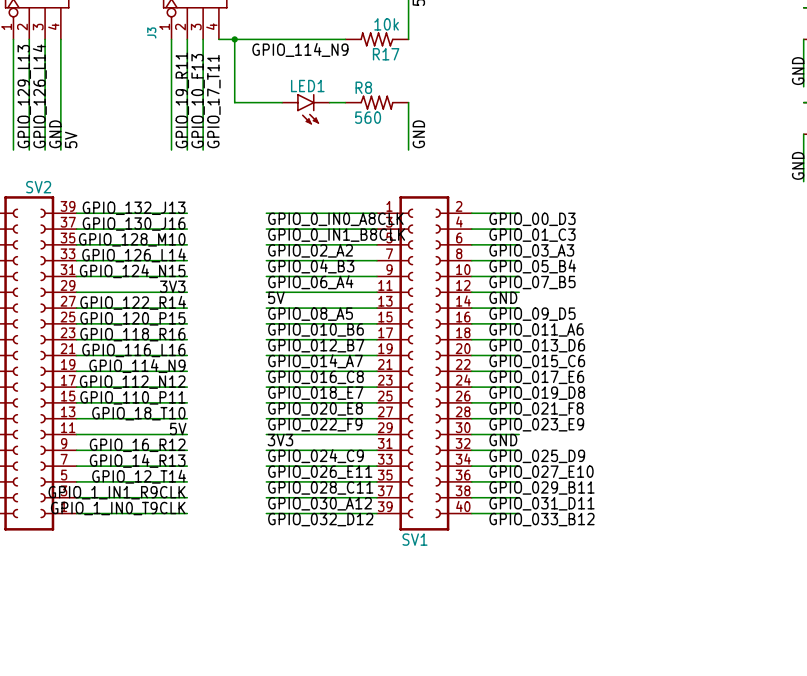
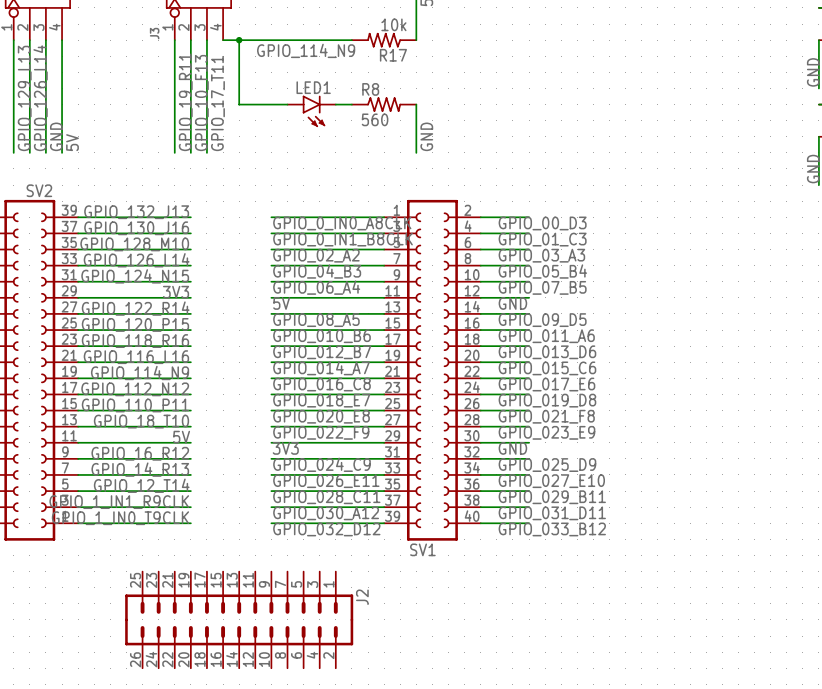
J2: none -> (239, 619)

